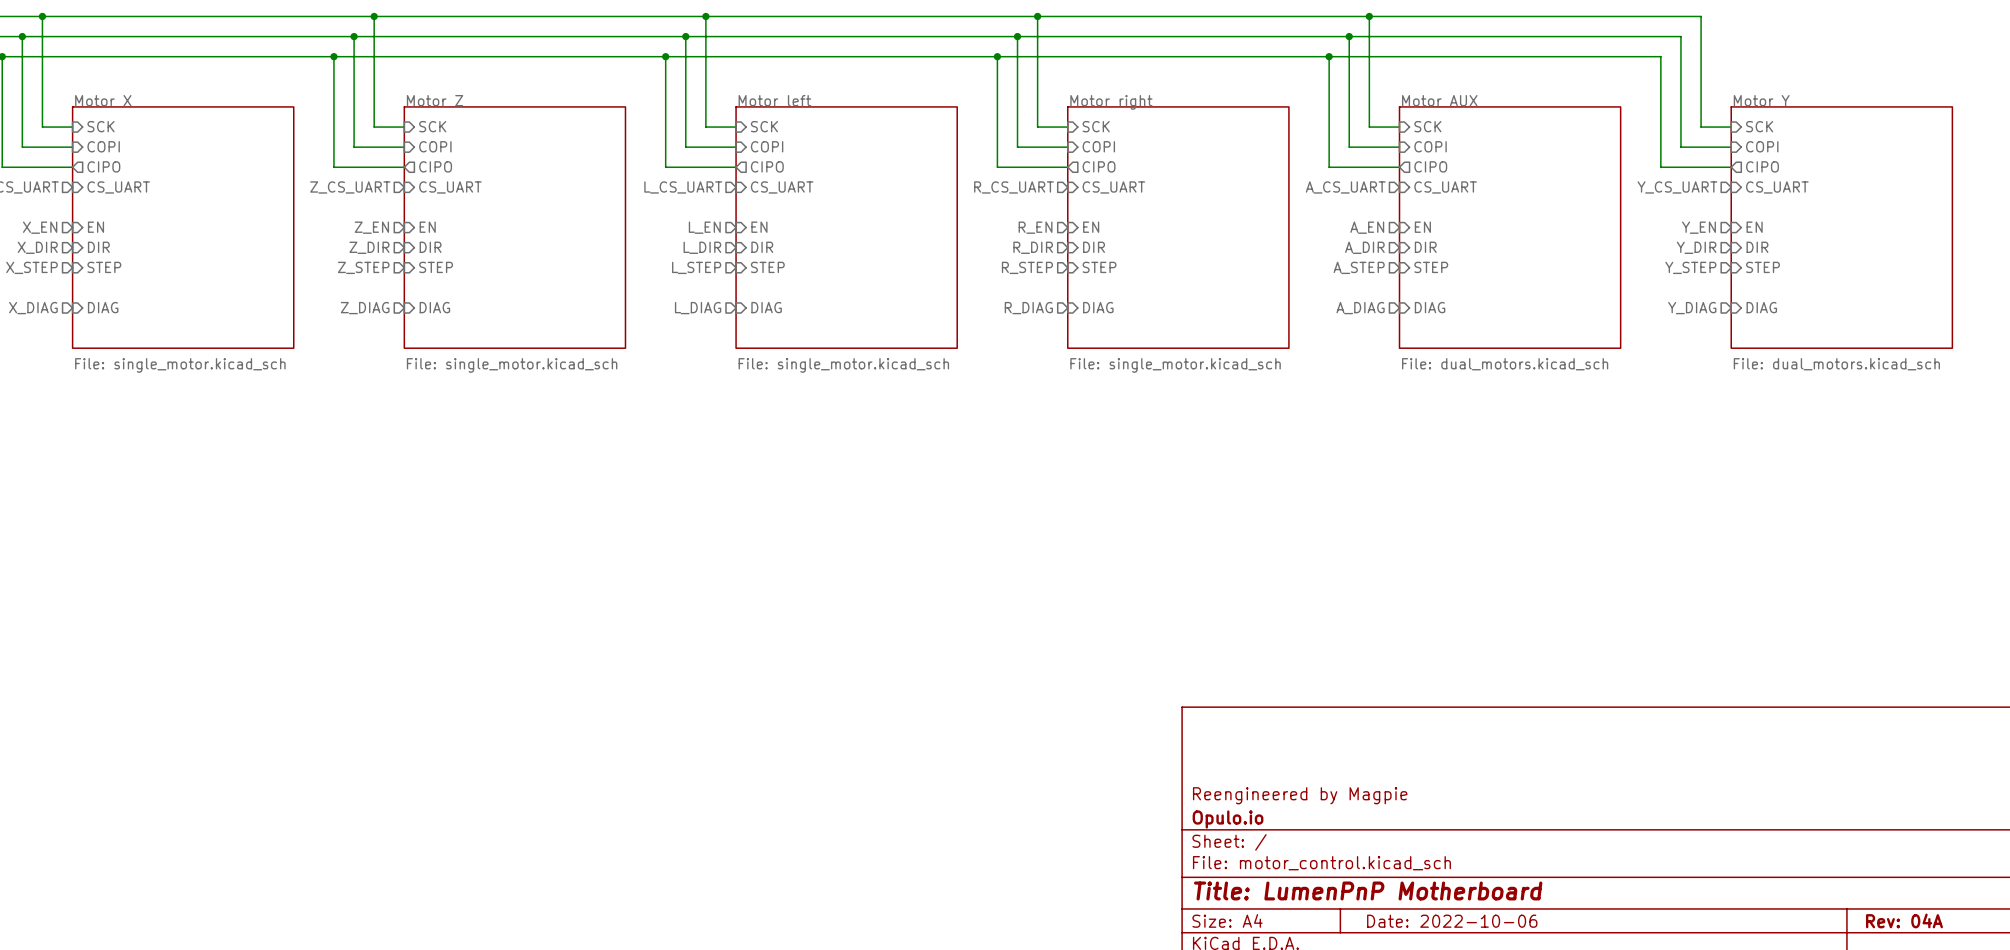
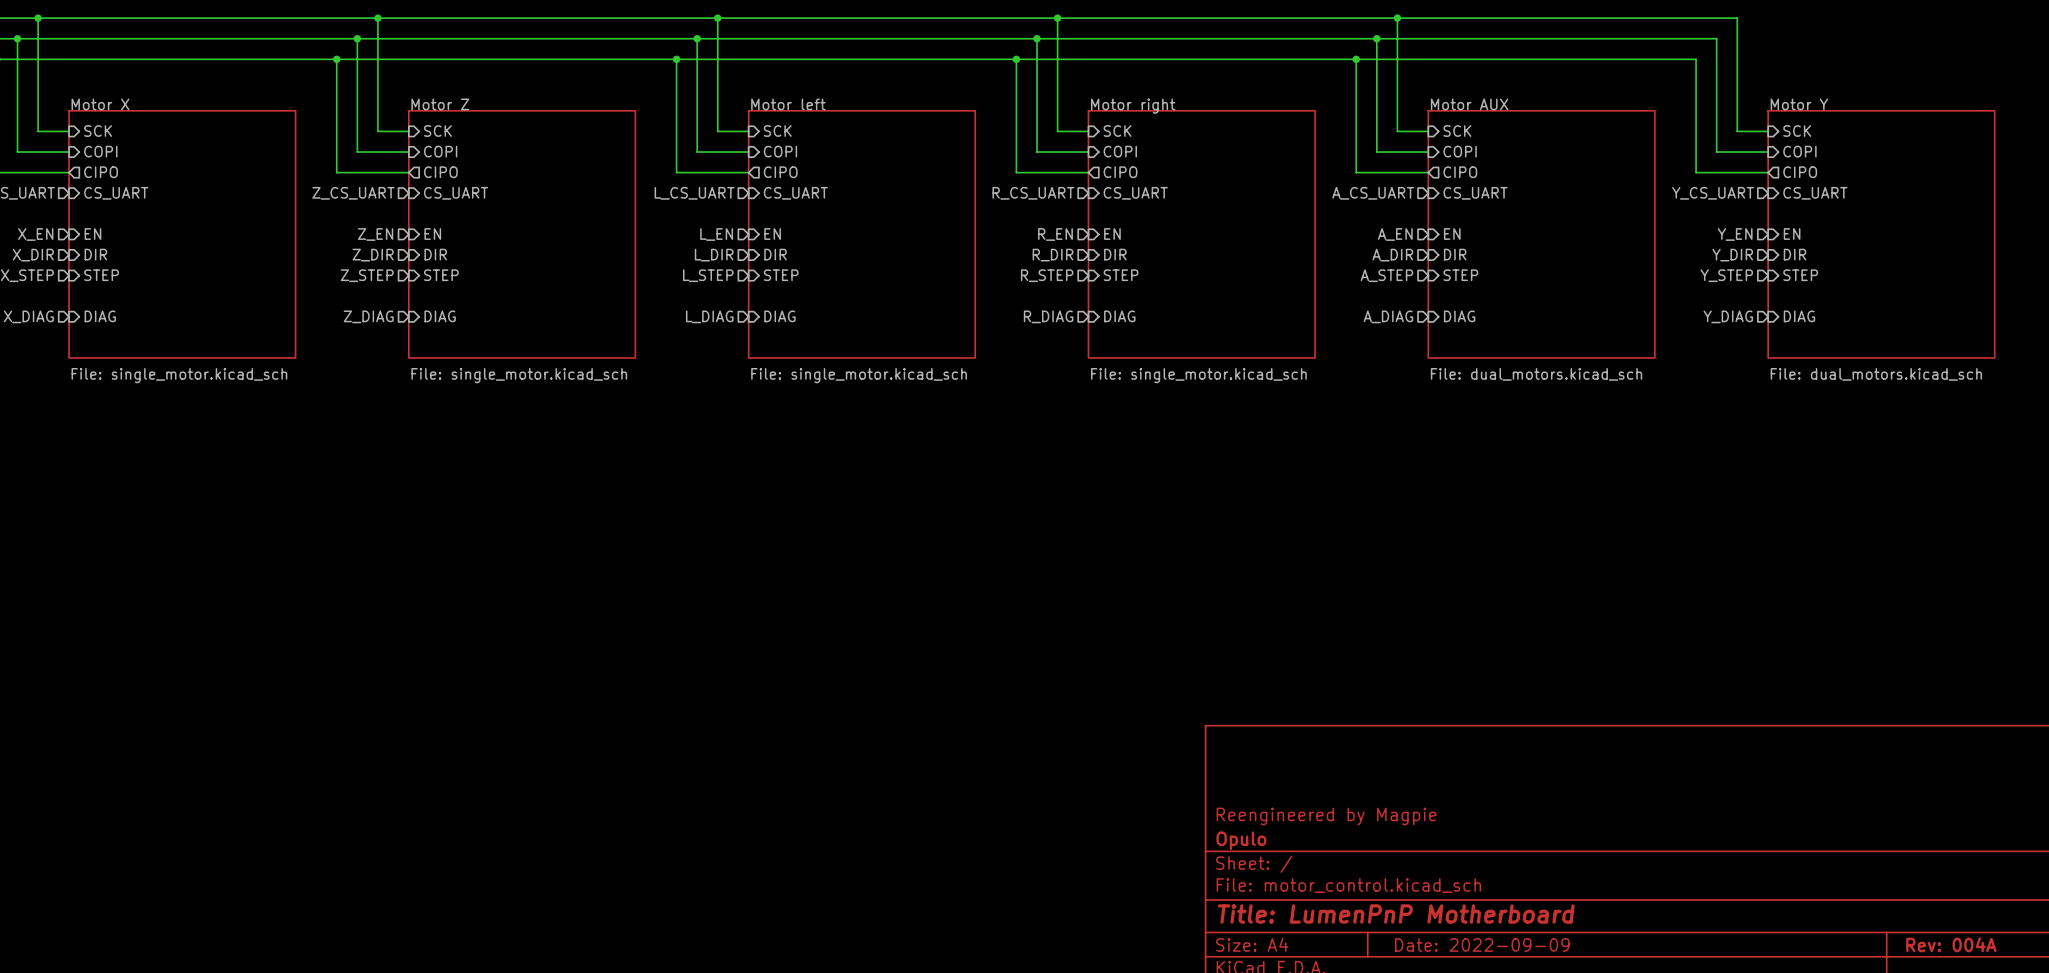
title block: Opulo.io (1228, 819) -> Opulo (1241, 840)
title block: Rev: 04A (1904, 920) -> Rev: 004A (1951, 944)
title block: Date: 2022-10-06 (1452, 921) -> Date: 2022-09-09 (1482, 944)

